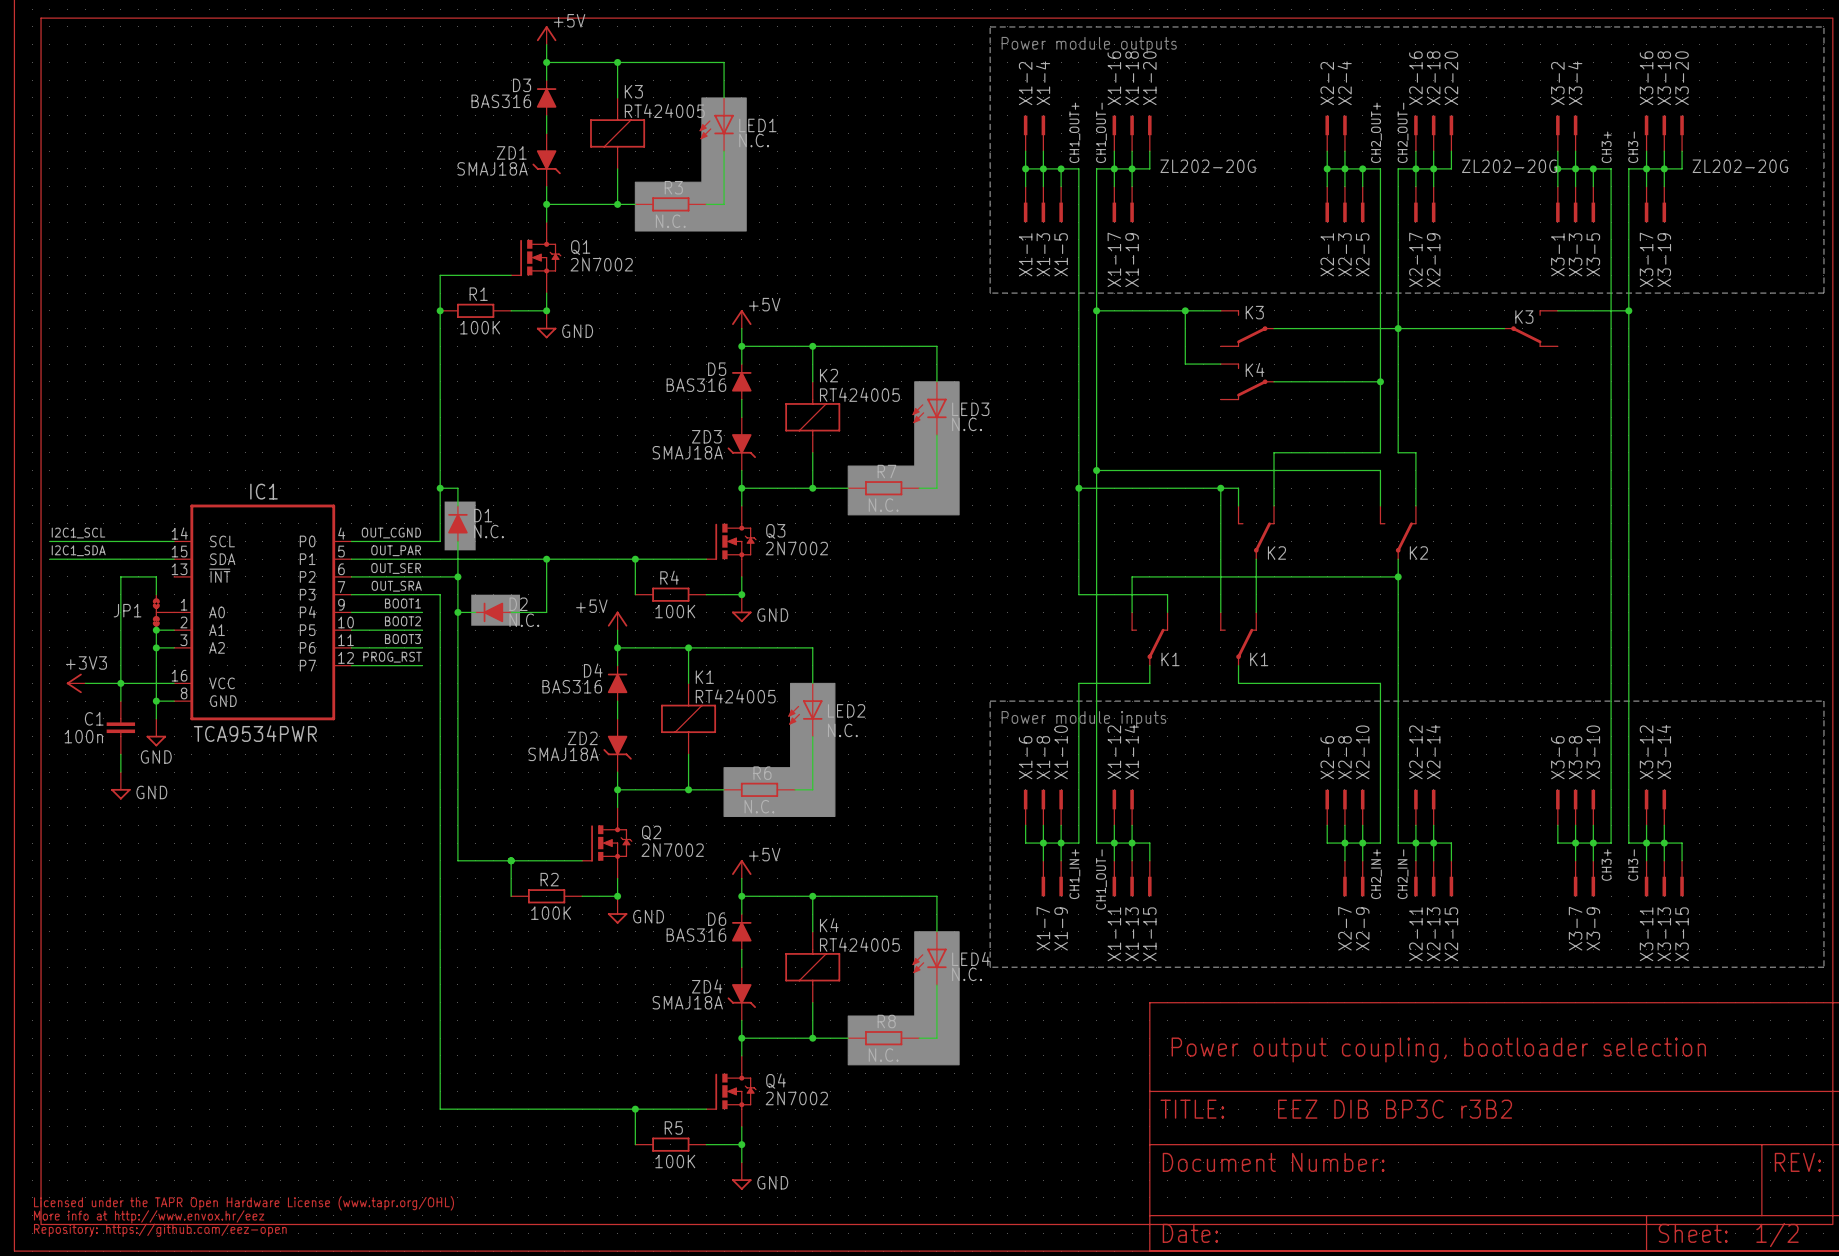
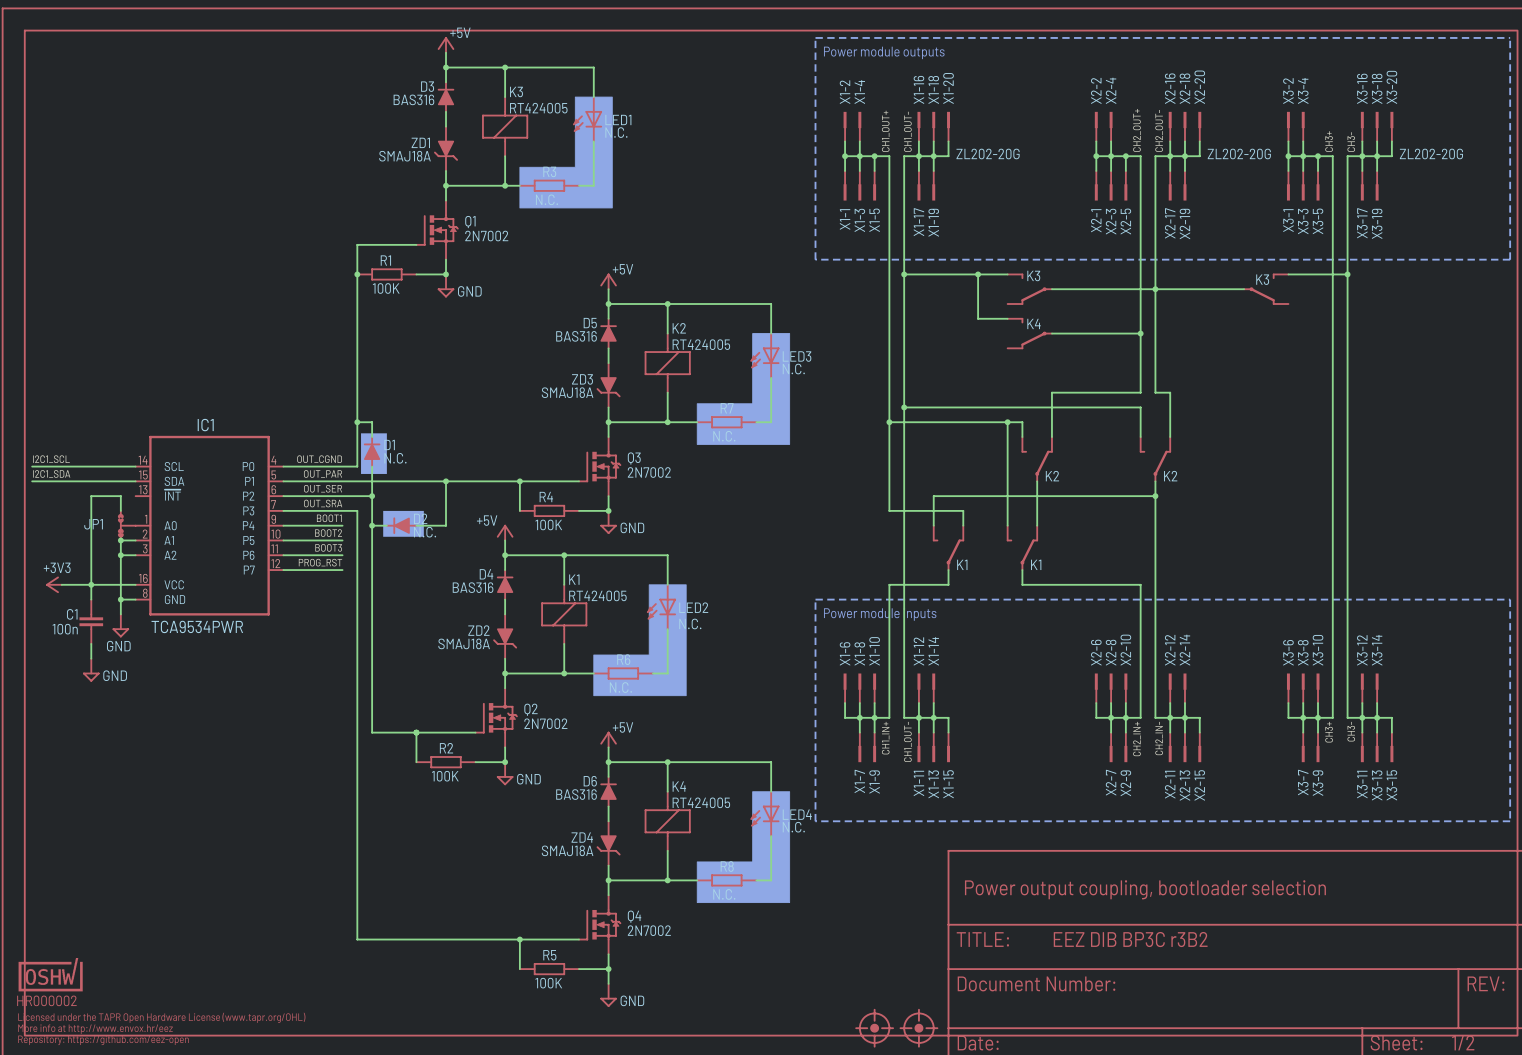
part: none -> HR000002 (50, 974)
part: none -> (874, 1028)
part: none -> (918, 1028)

